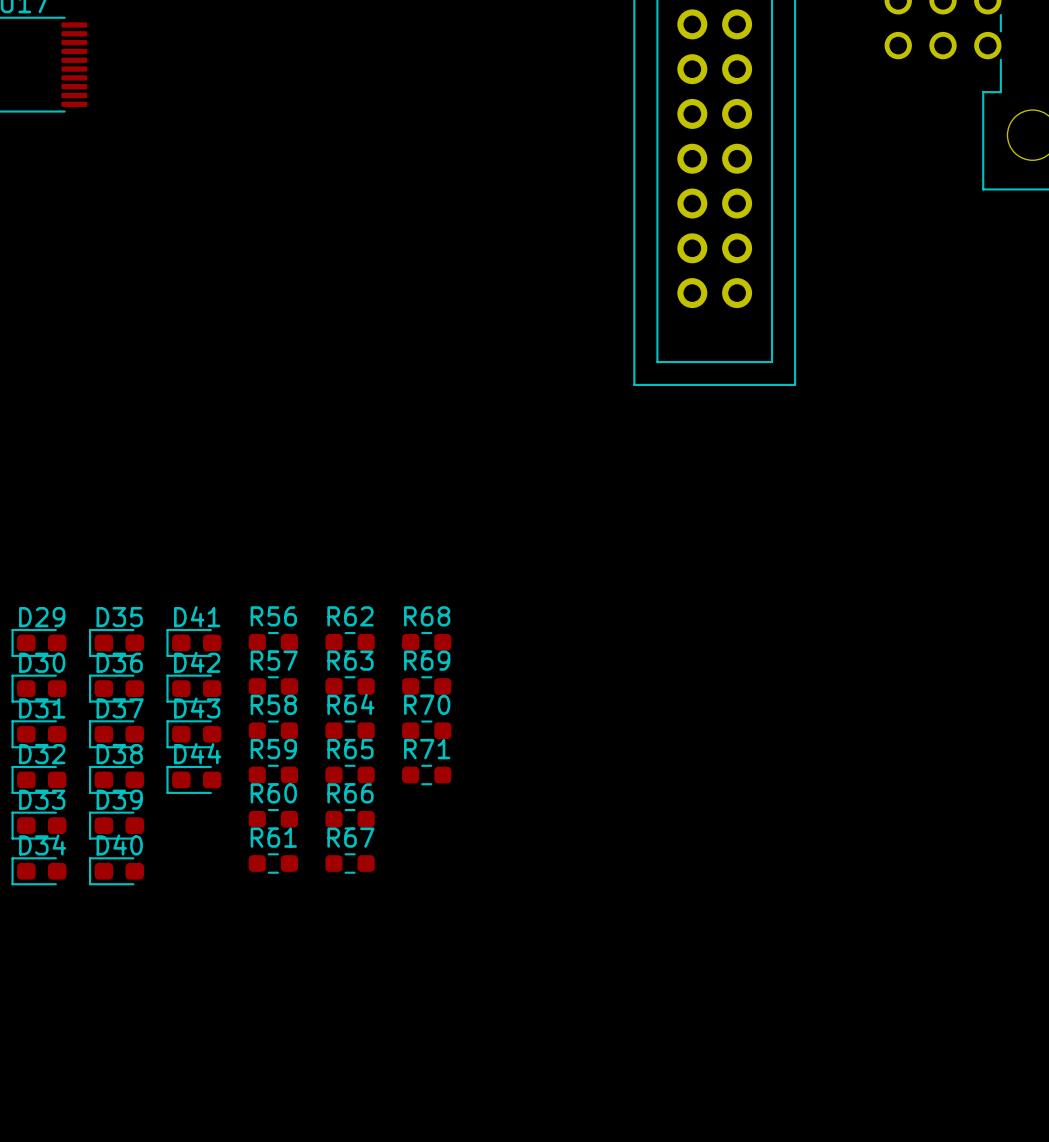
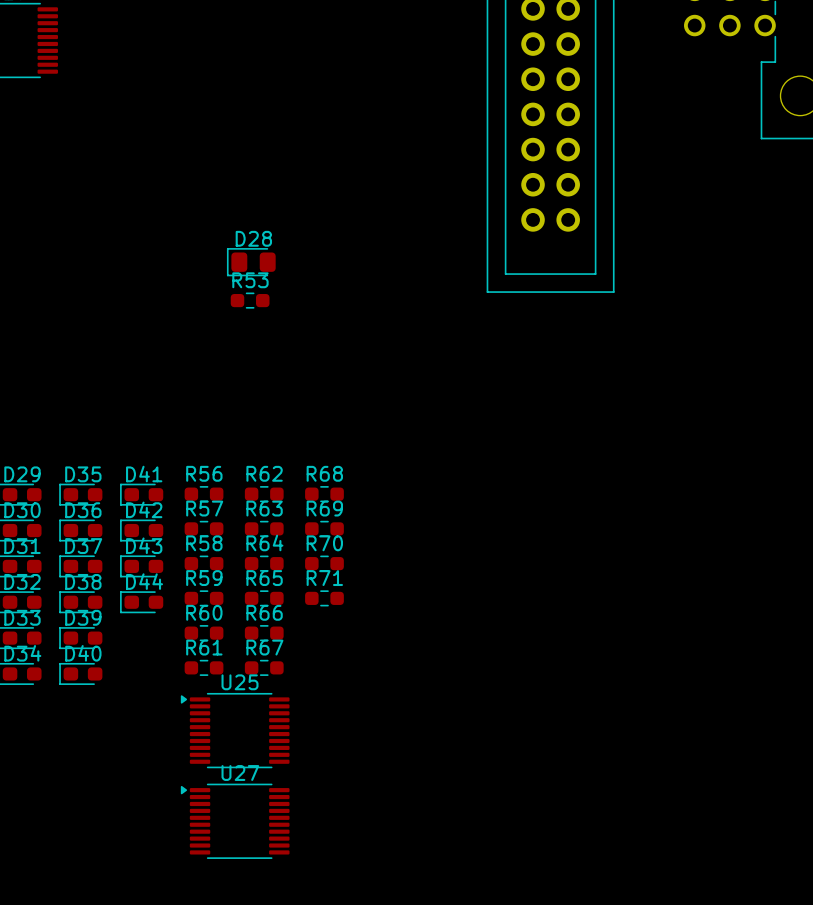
D28: none -> (251, 262)
R53: none -> (250, 300)
U25: none -> (235, 730)
U27: none -> (235, 821)

